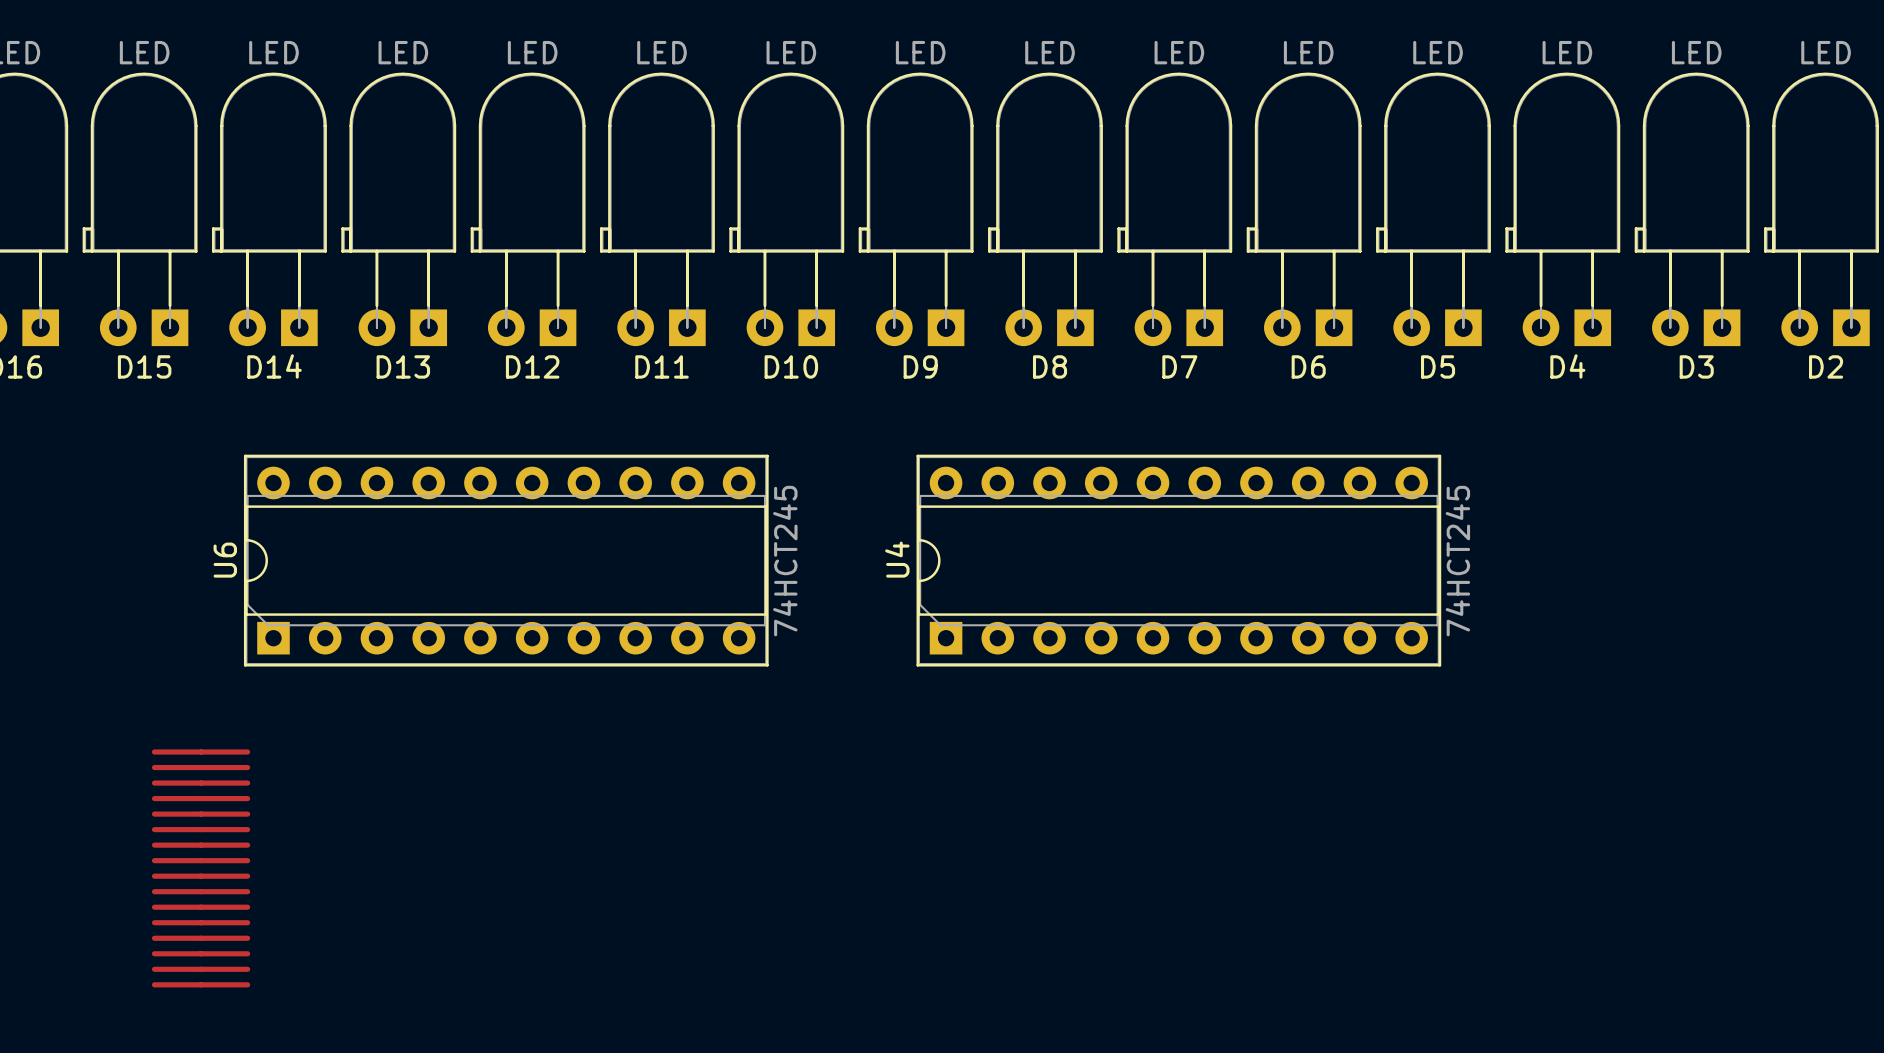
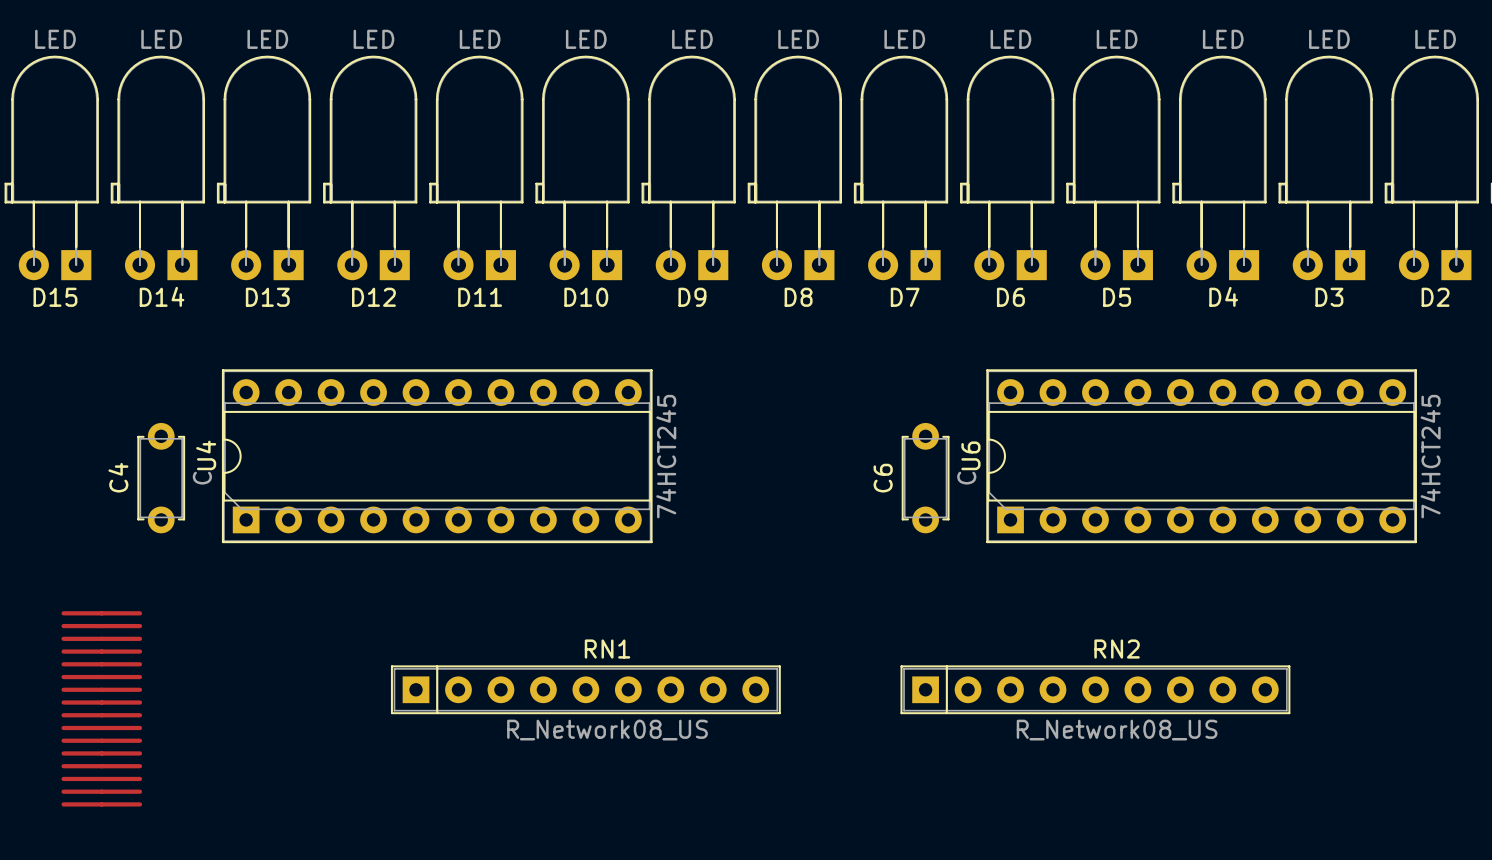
U6 position: (506, 560) -> (1201, 456)
U4 position: (1178, 560) -> (437, 456)
C4: none -> C (161, 478)
C6: none -> C (925, 478)
RN1: none -> R_Network08_US (585, 689)
RN2: none -> R_Network08_US (1095, 689)

